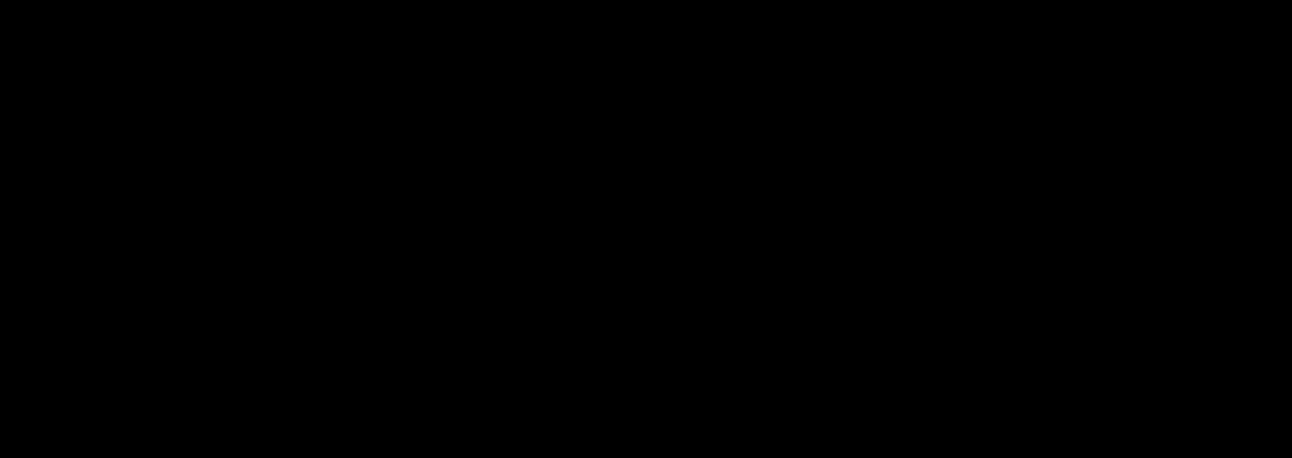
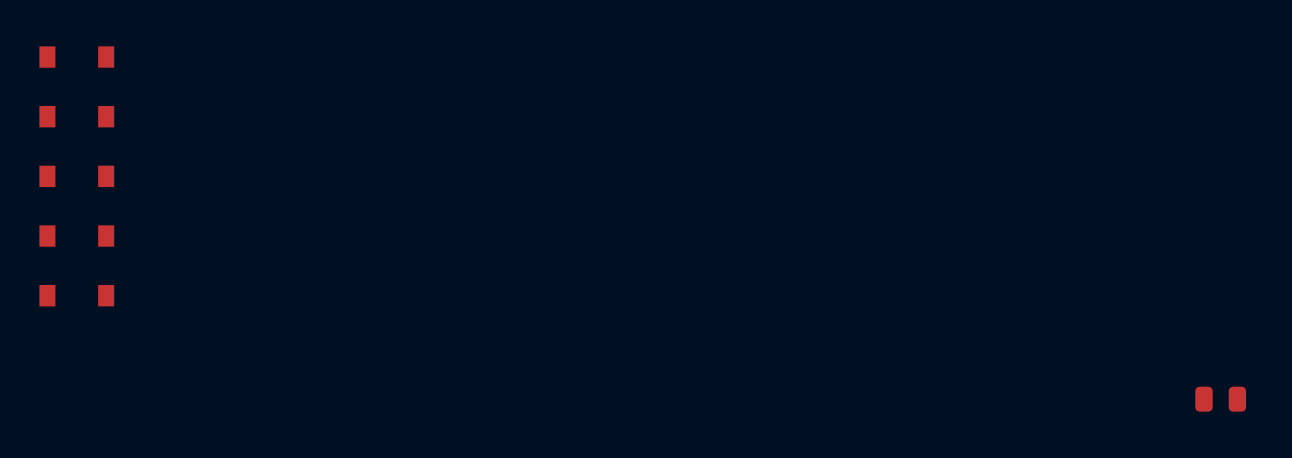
part: none -> (76, 57)
part: none -> (76, 116)
part: none -> (76, 176)
part: none -> (76, 236)
part: none -> (76, 295)
part: none -> (1220, 399)

